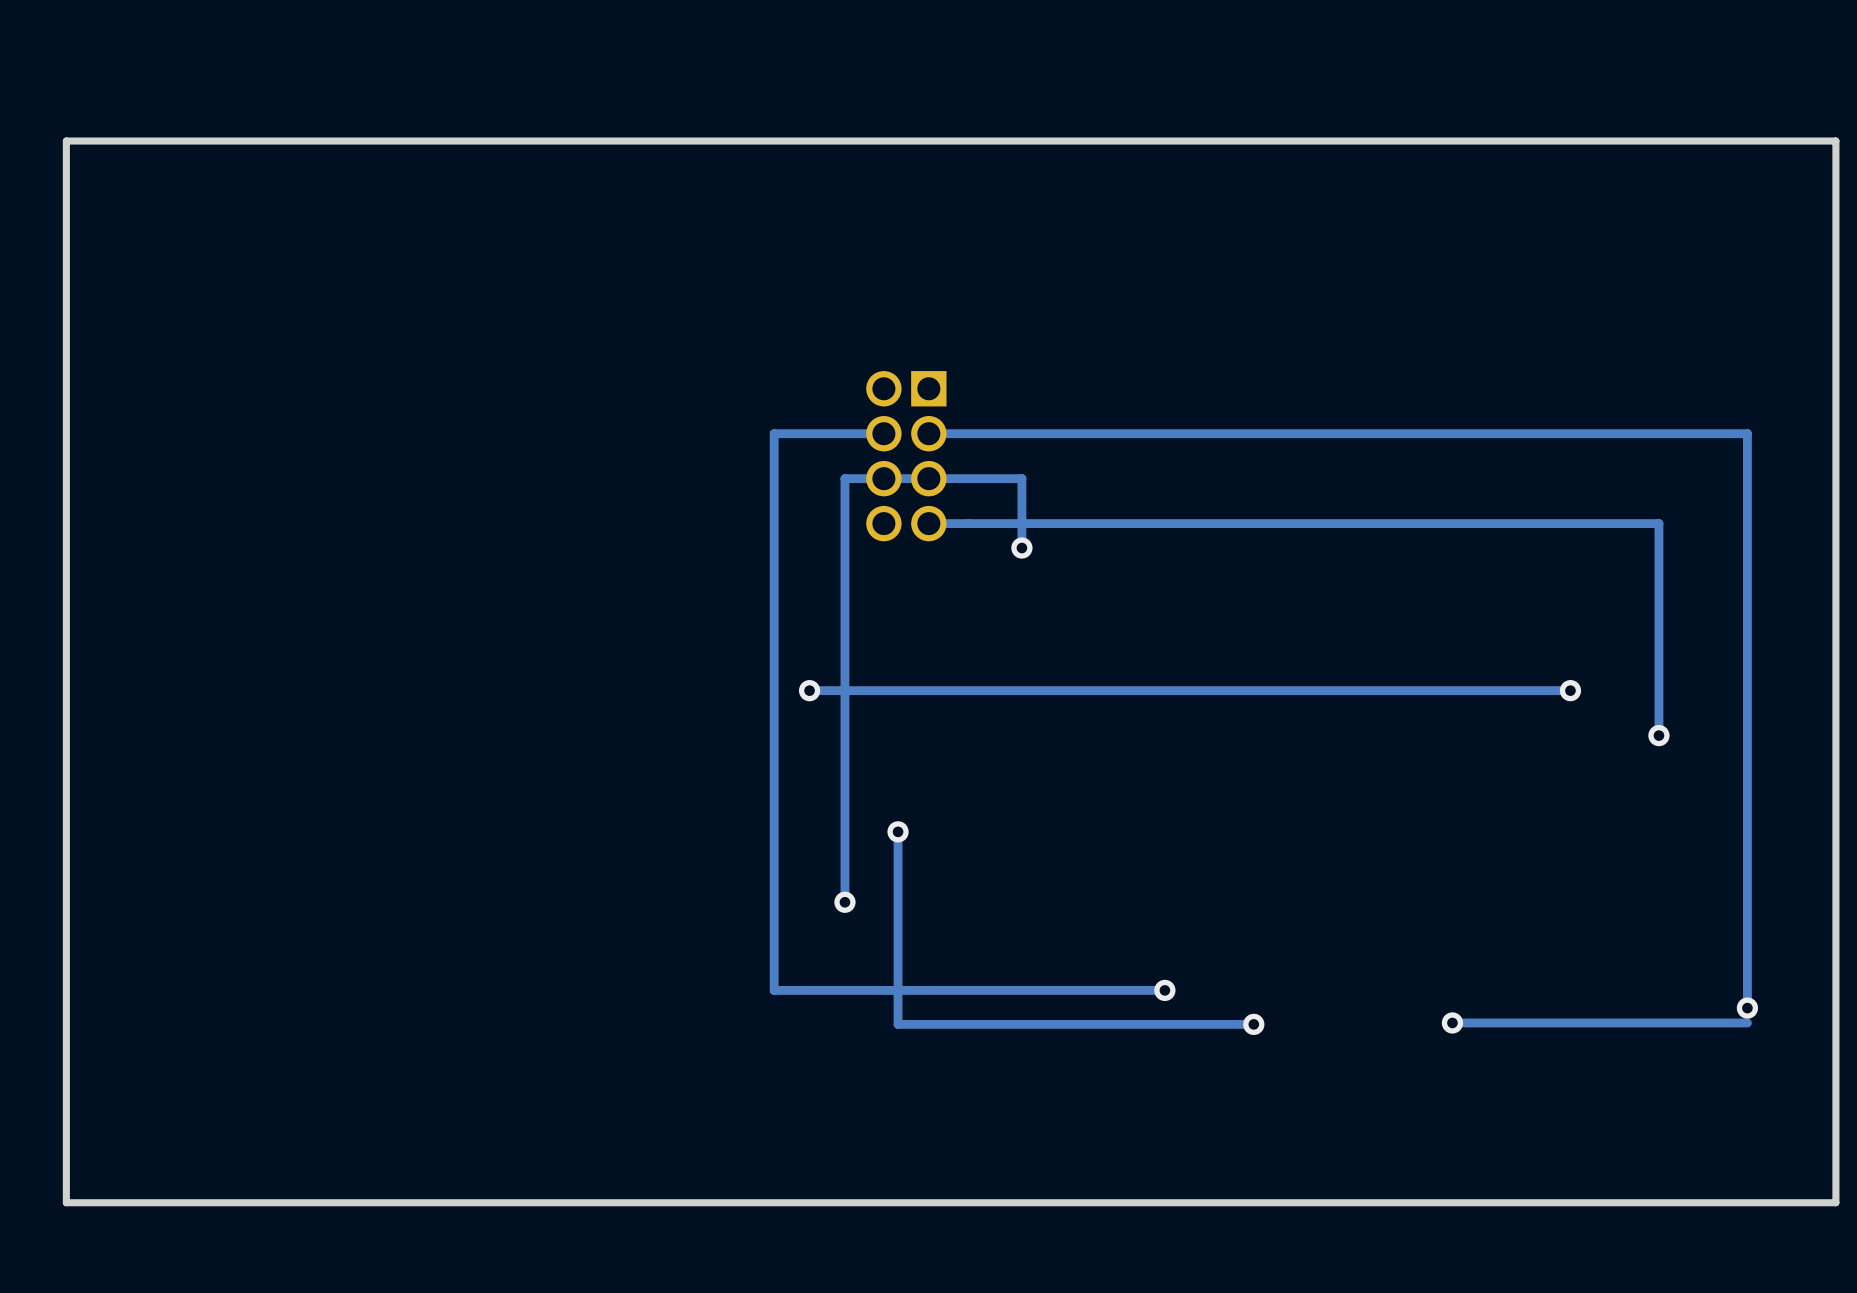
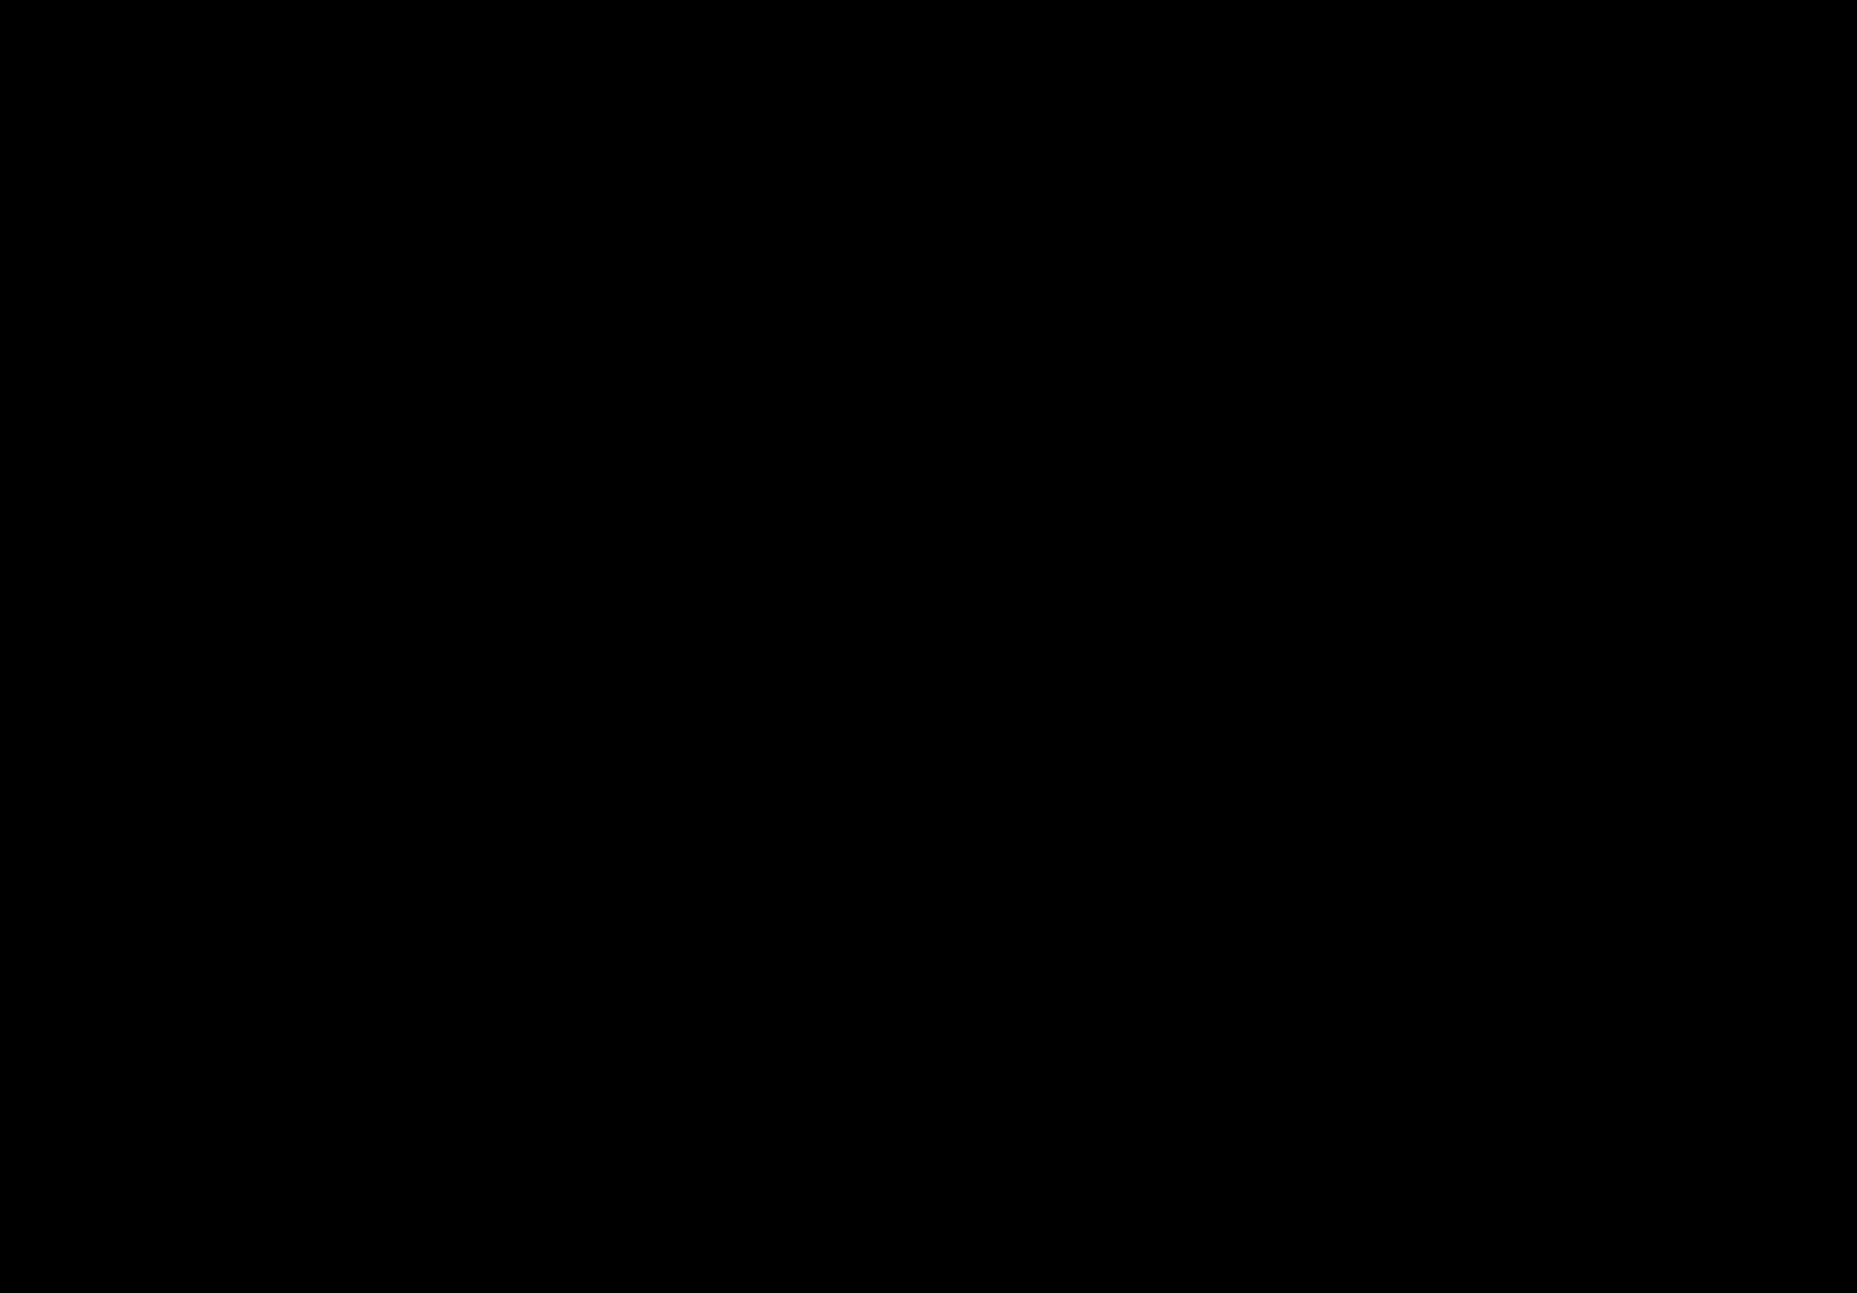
board edge: (1835, 141) (66, 141) (66, 1202) (1835, 1202) (1835, 141) -> none
track: (883, 433) (774, 433) (774, 990) (1164, 990) -> none
track: (928, 433) (1747, 433) (1747, 1008) -> none
part: (906, 456) -> none
track: (928, 523) (1658, 523) (1658, 735) -> none
track: (1021, 548) (1021, 478) (844, 478) (844, 902) -> none
via: (1021, 548) -> none
via: (809, 690) -> none
track: (1570, 690) (809, 690) -> none
via: (1570, 690) -> none
via: (1658, 735) -> none
track: (898, 831) (898, 1024) (1253, 1024) -> none
via: (898, 831) -> none
via: (844, 902) -> none
via: (1164, 990) -> none
via: (1747, 1008) -> none
via: (1452, 1022) -> none
track: (1747, 1022) (1452, 1022) -> none
via: (1253, 1024) -> none

